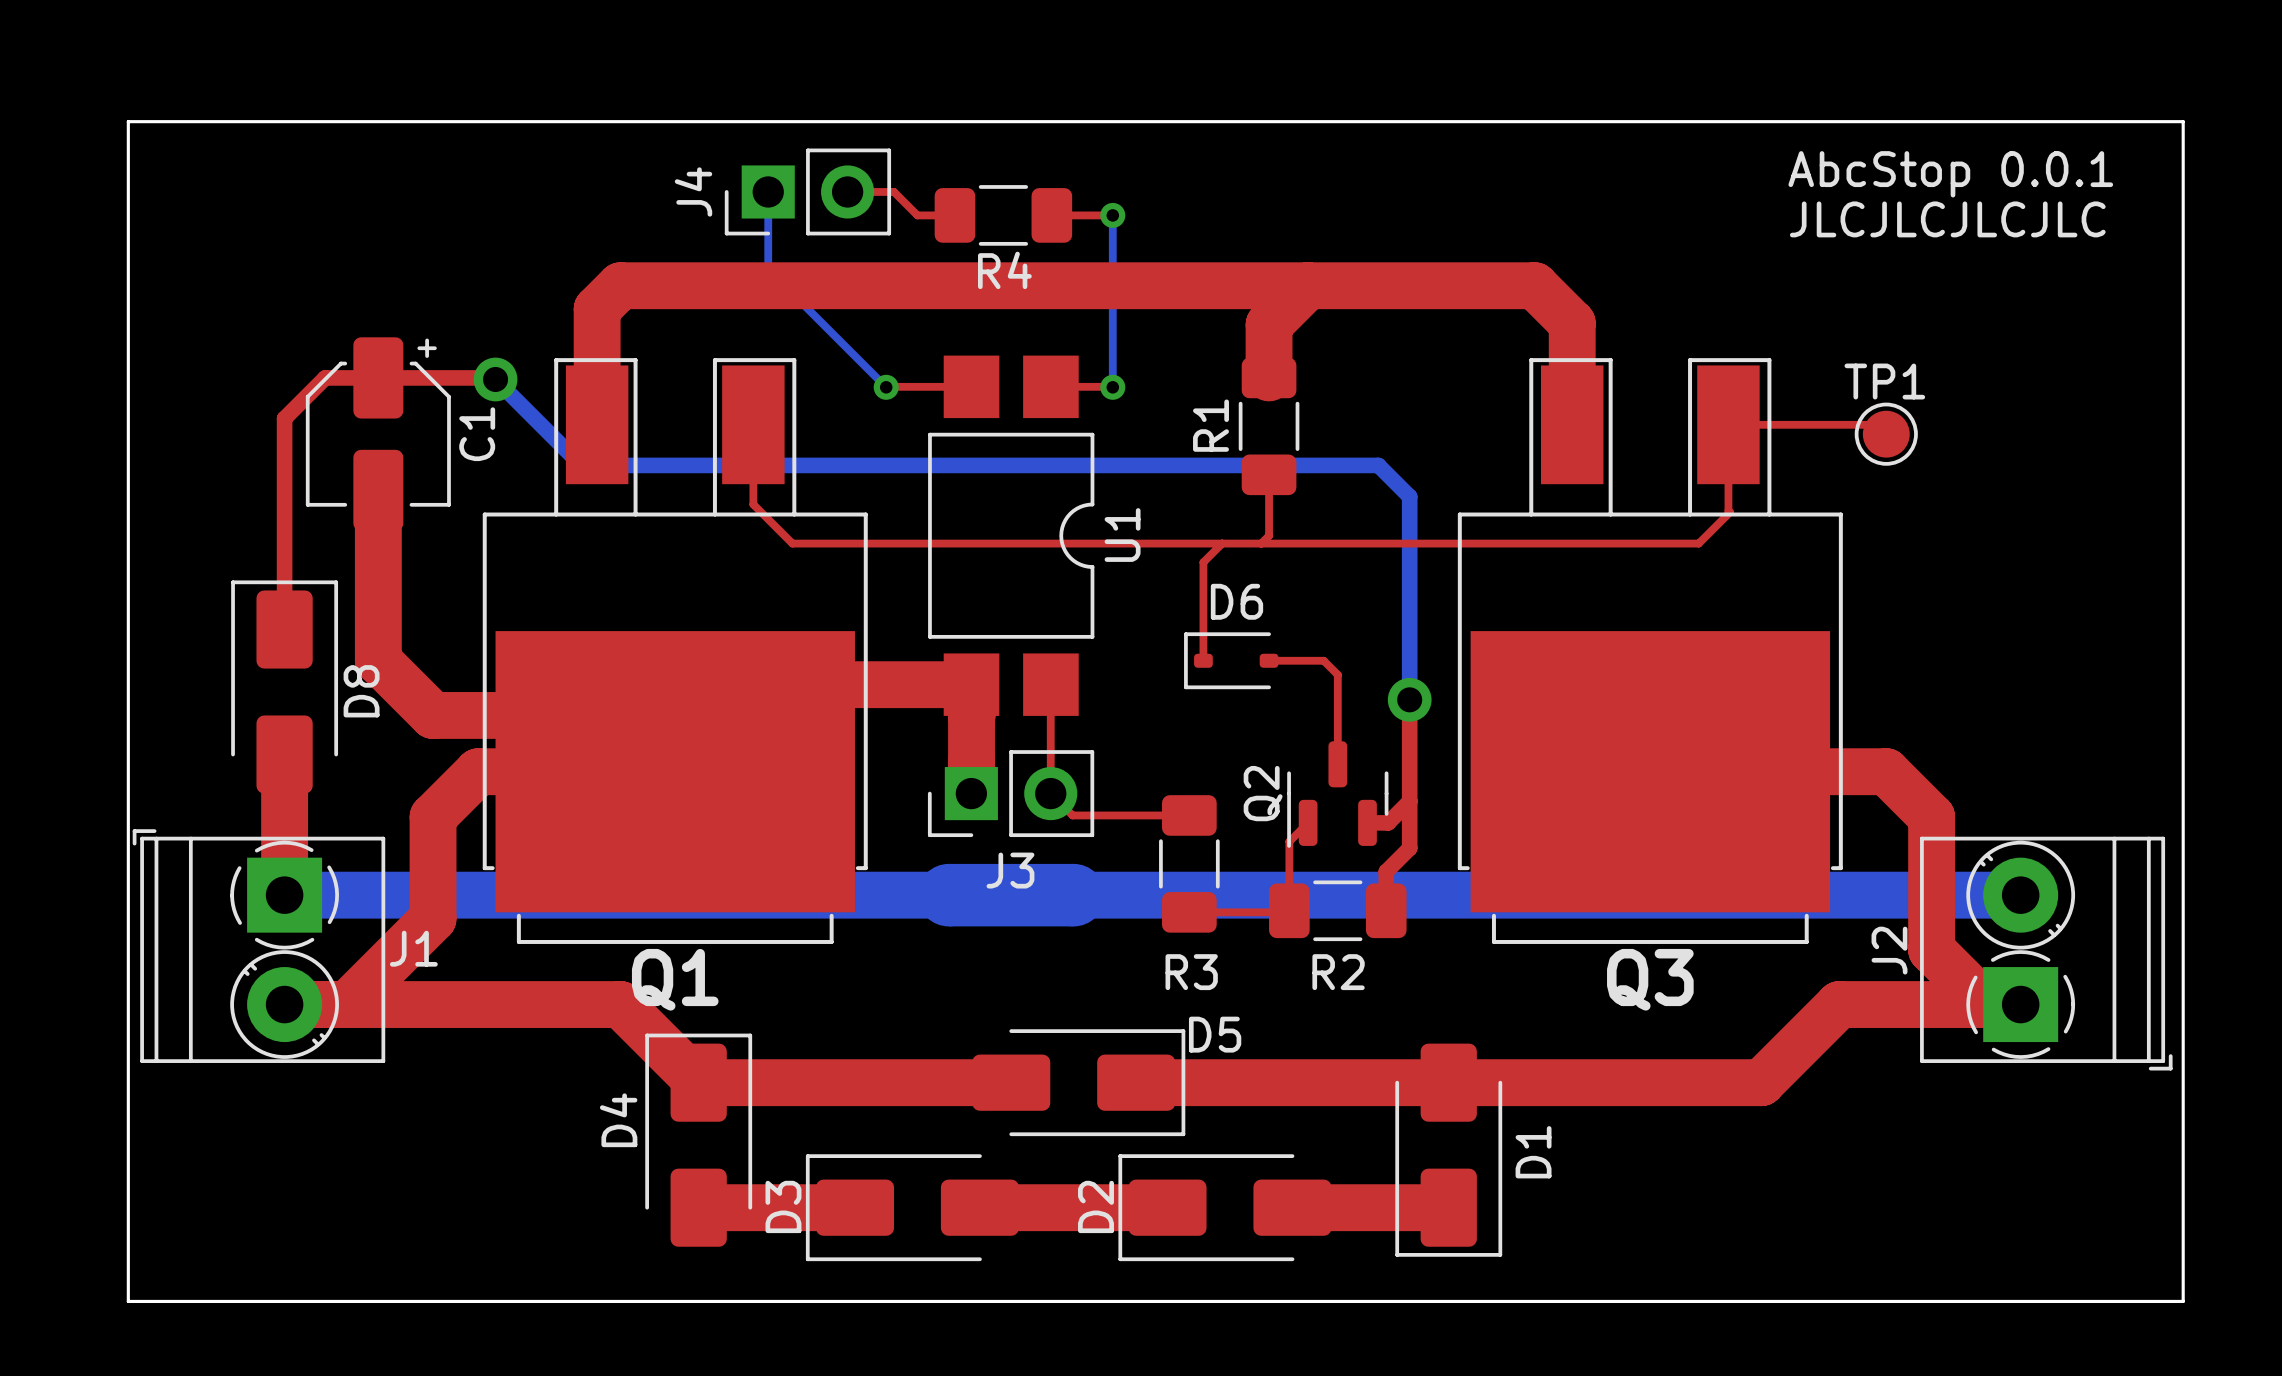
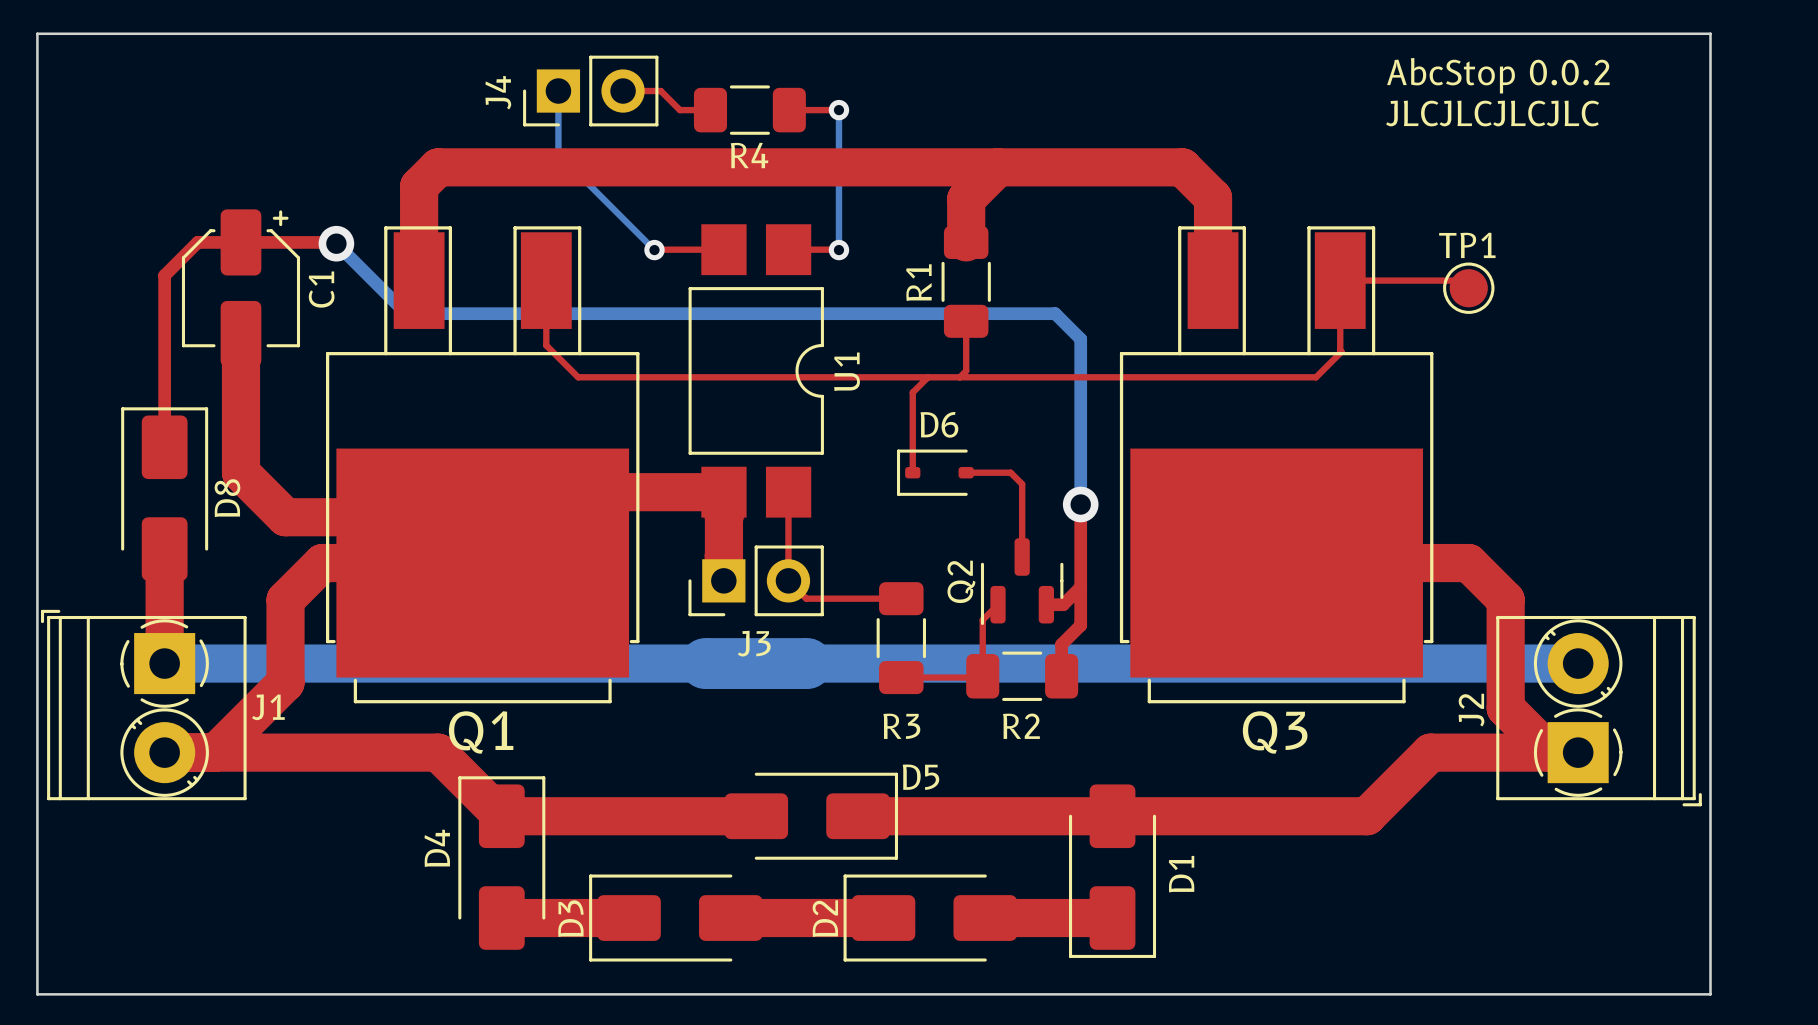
text: AbcStop 0.0.1 (1950, 174) -> AbcStop 0.0.2 (1498, 75)

